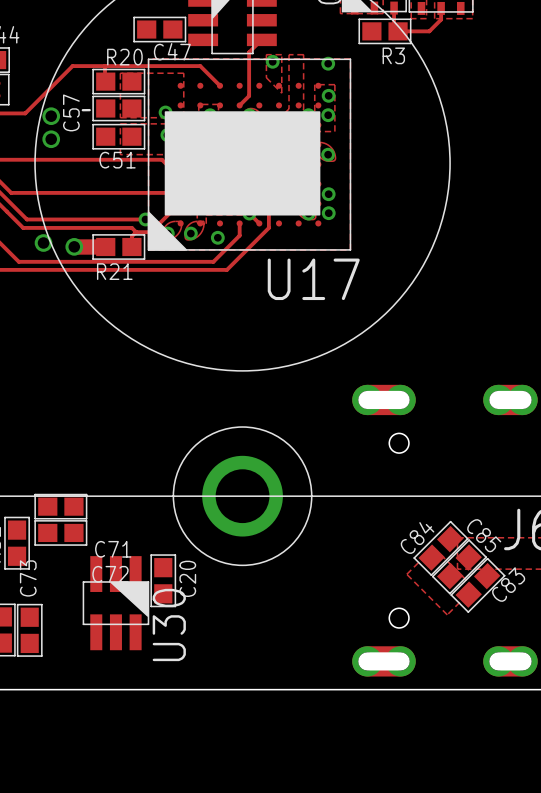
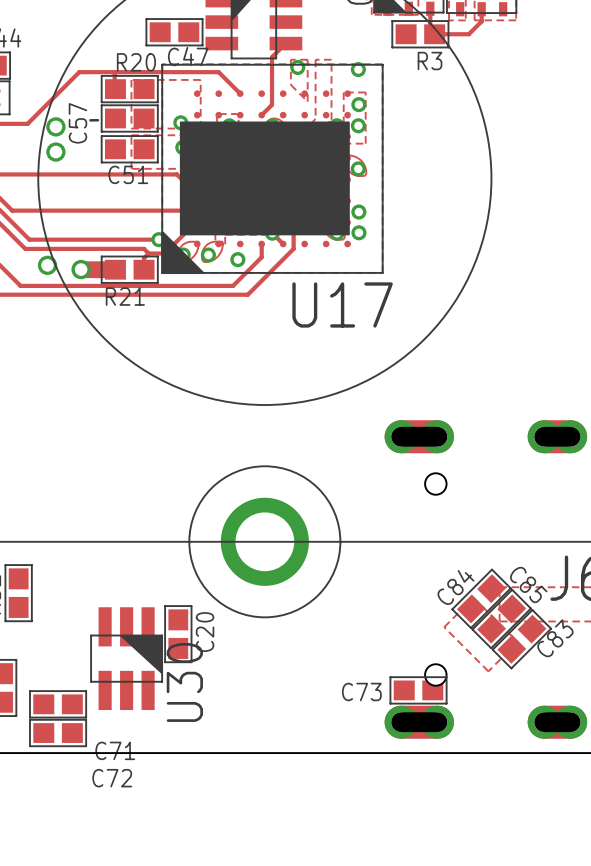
C71 position: (60, 506) -> (58, 704)
C72 position: (60, 532) -> (58, 733)
C73 name position: C73 (28, 578) -> C73 (361, 691)
C73 rotation: 0° (29, 630) -> 90° clockwise (418, 690)
C73 position: (29, 630) -> (418, 690)

